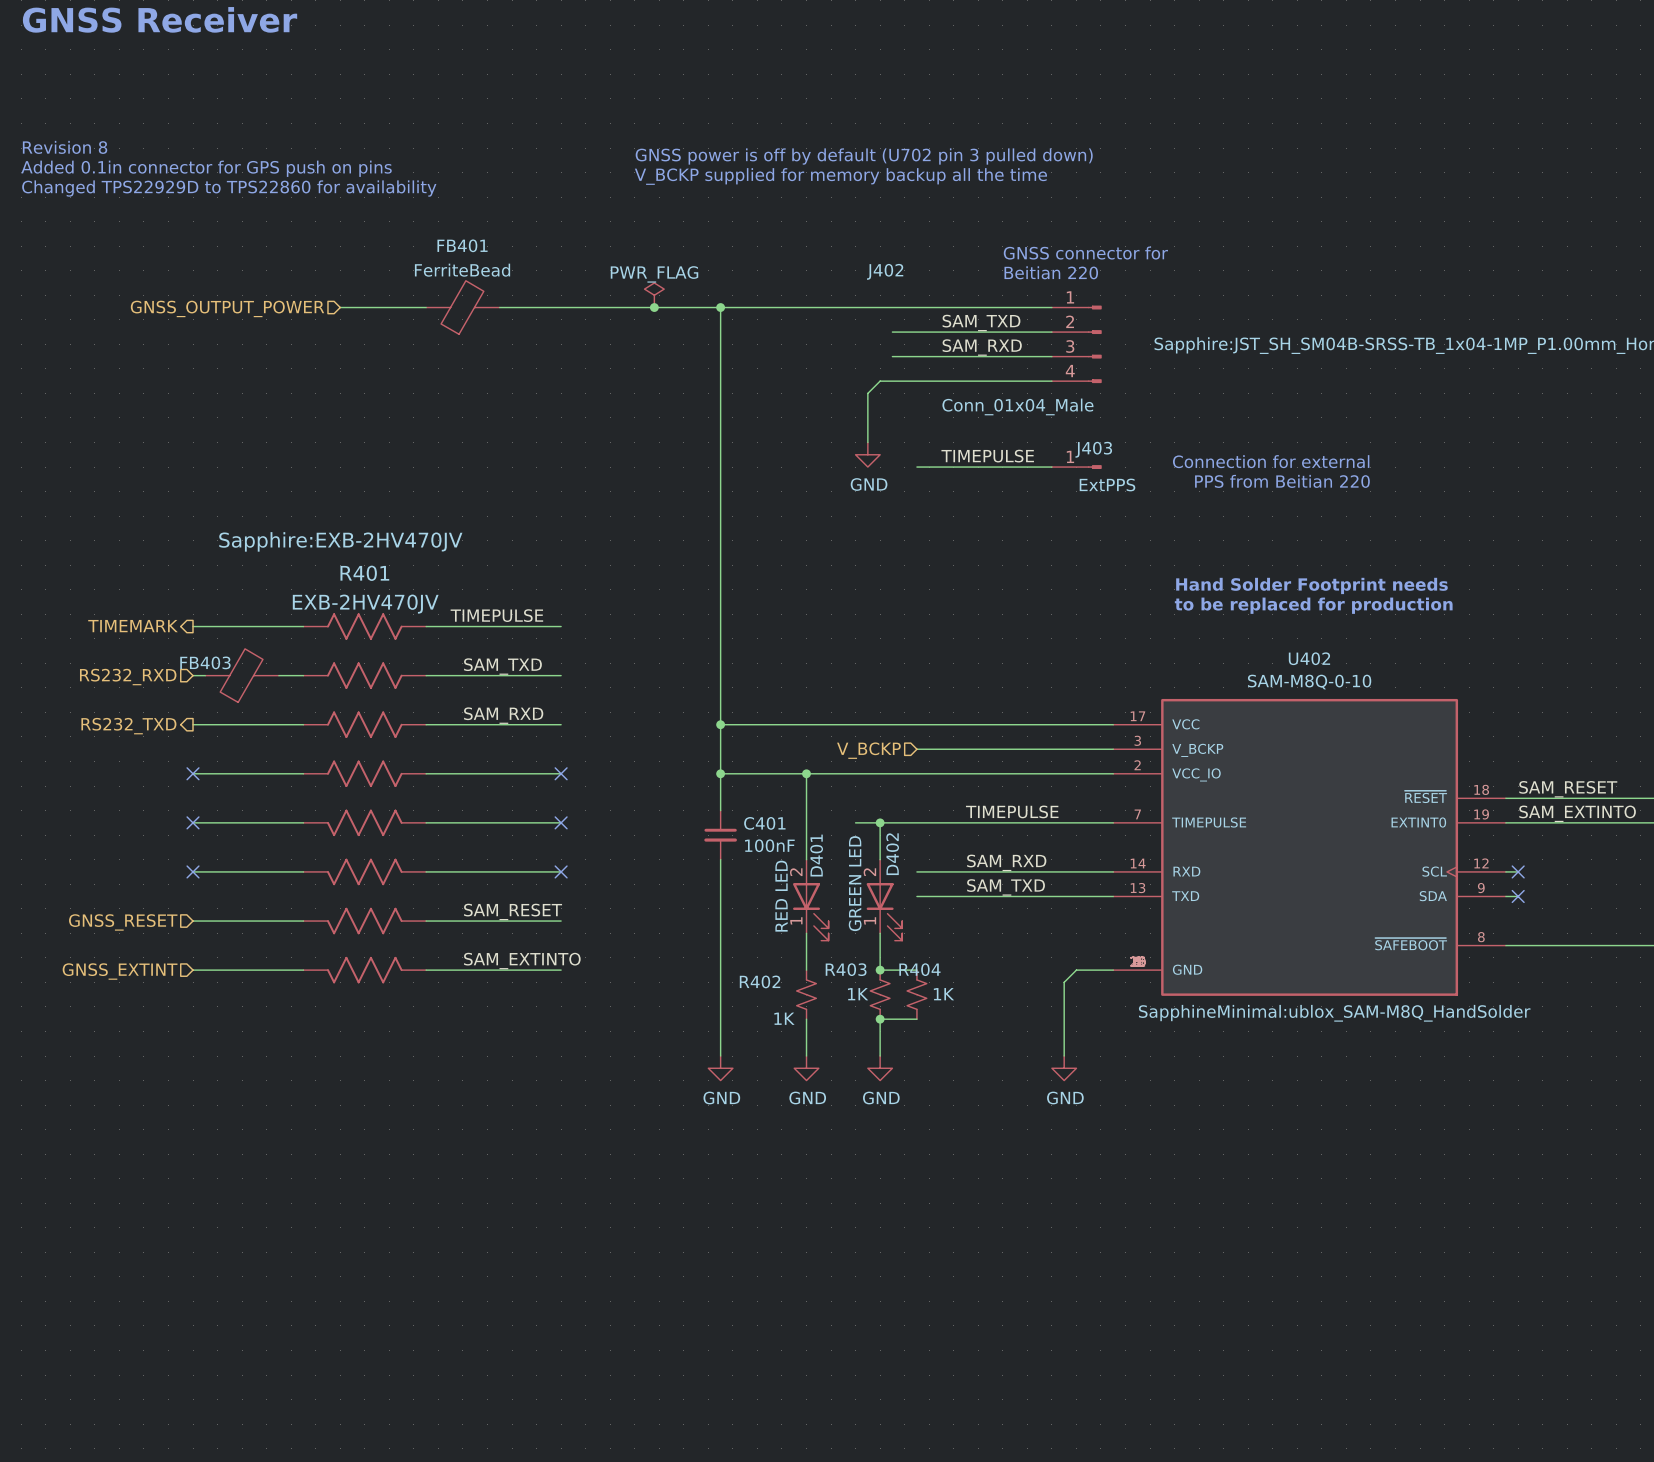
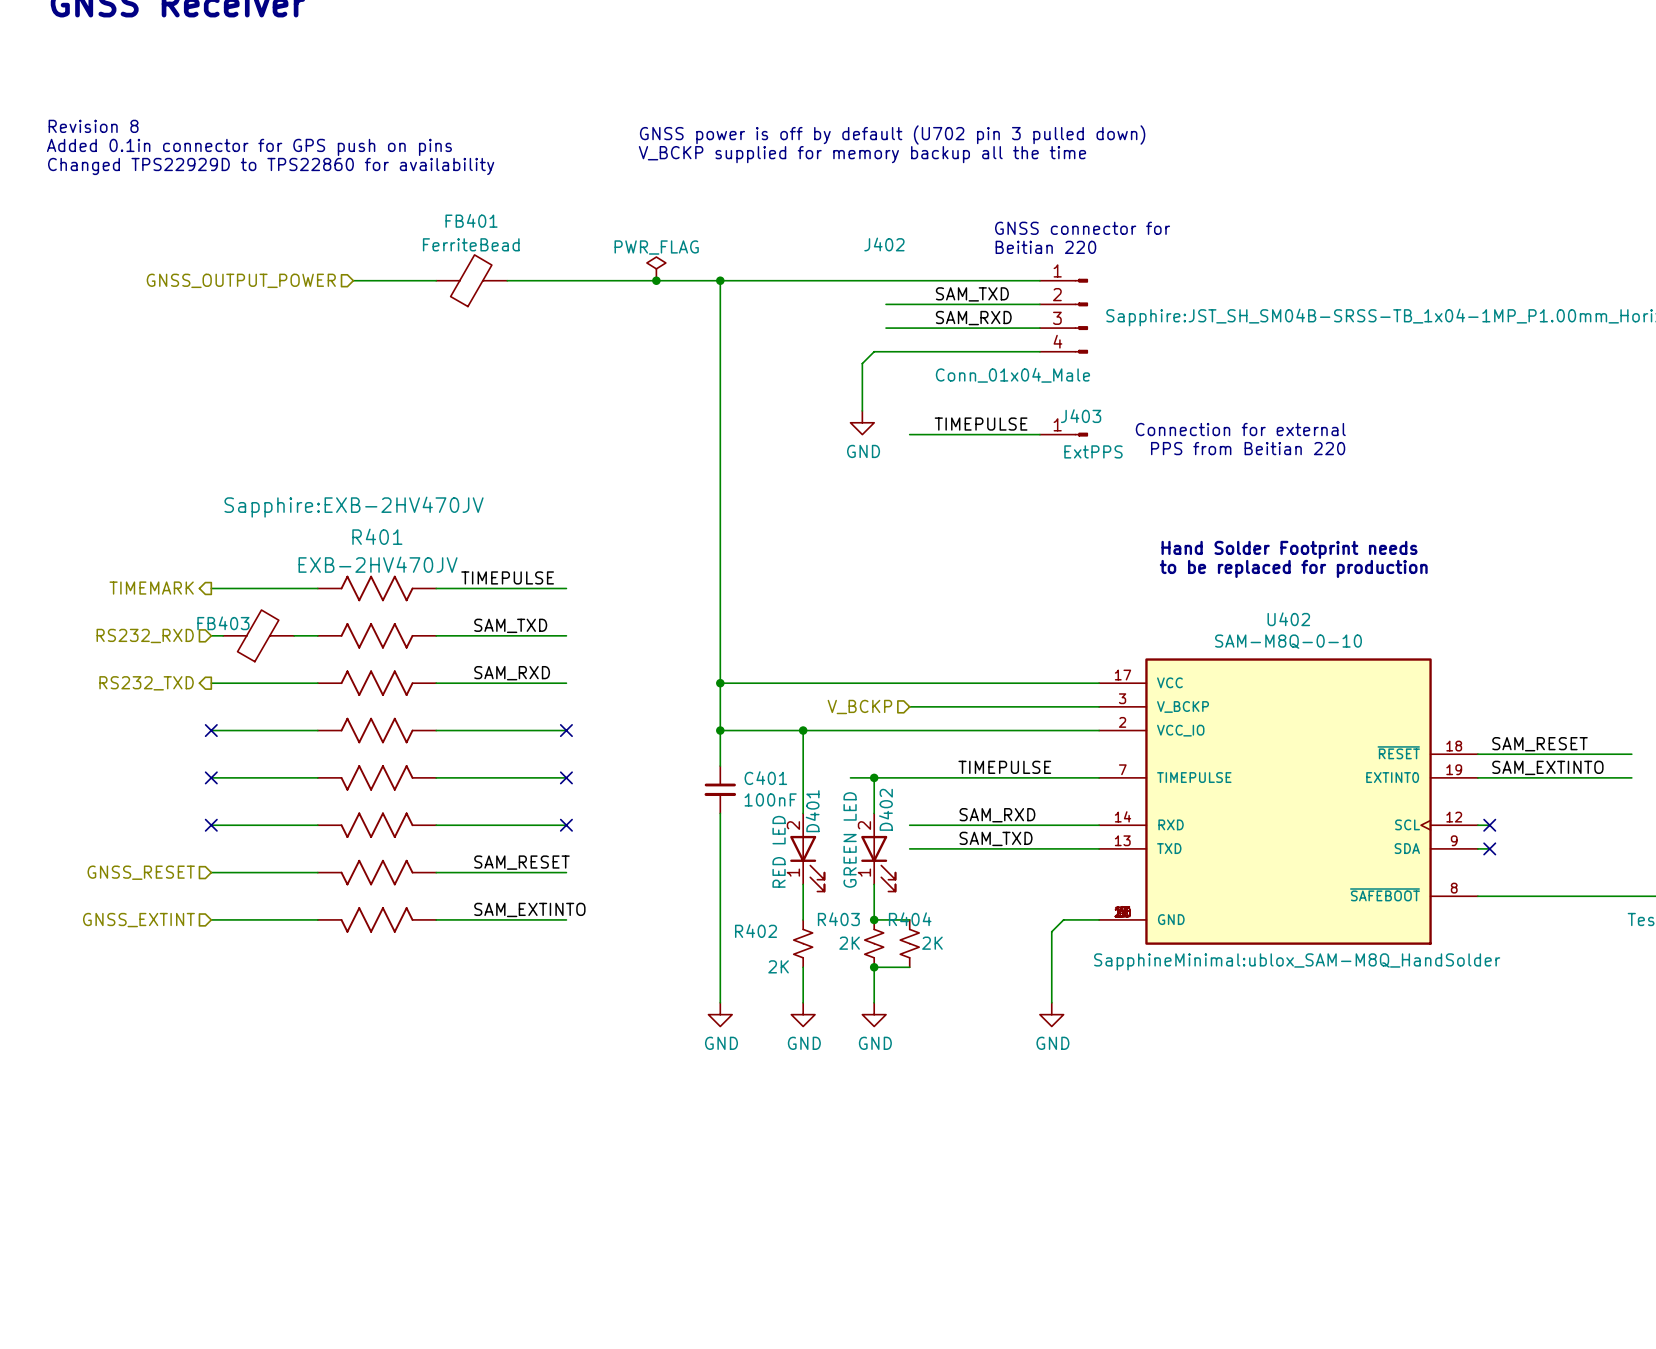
R403 value: 1K (858, 994) -> 2K (849, 943)
R404 value: 1K (943, 994) -> 2K (932, 943)
R402 value: 1K (784, 1018) -> 2K (778, 966)

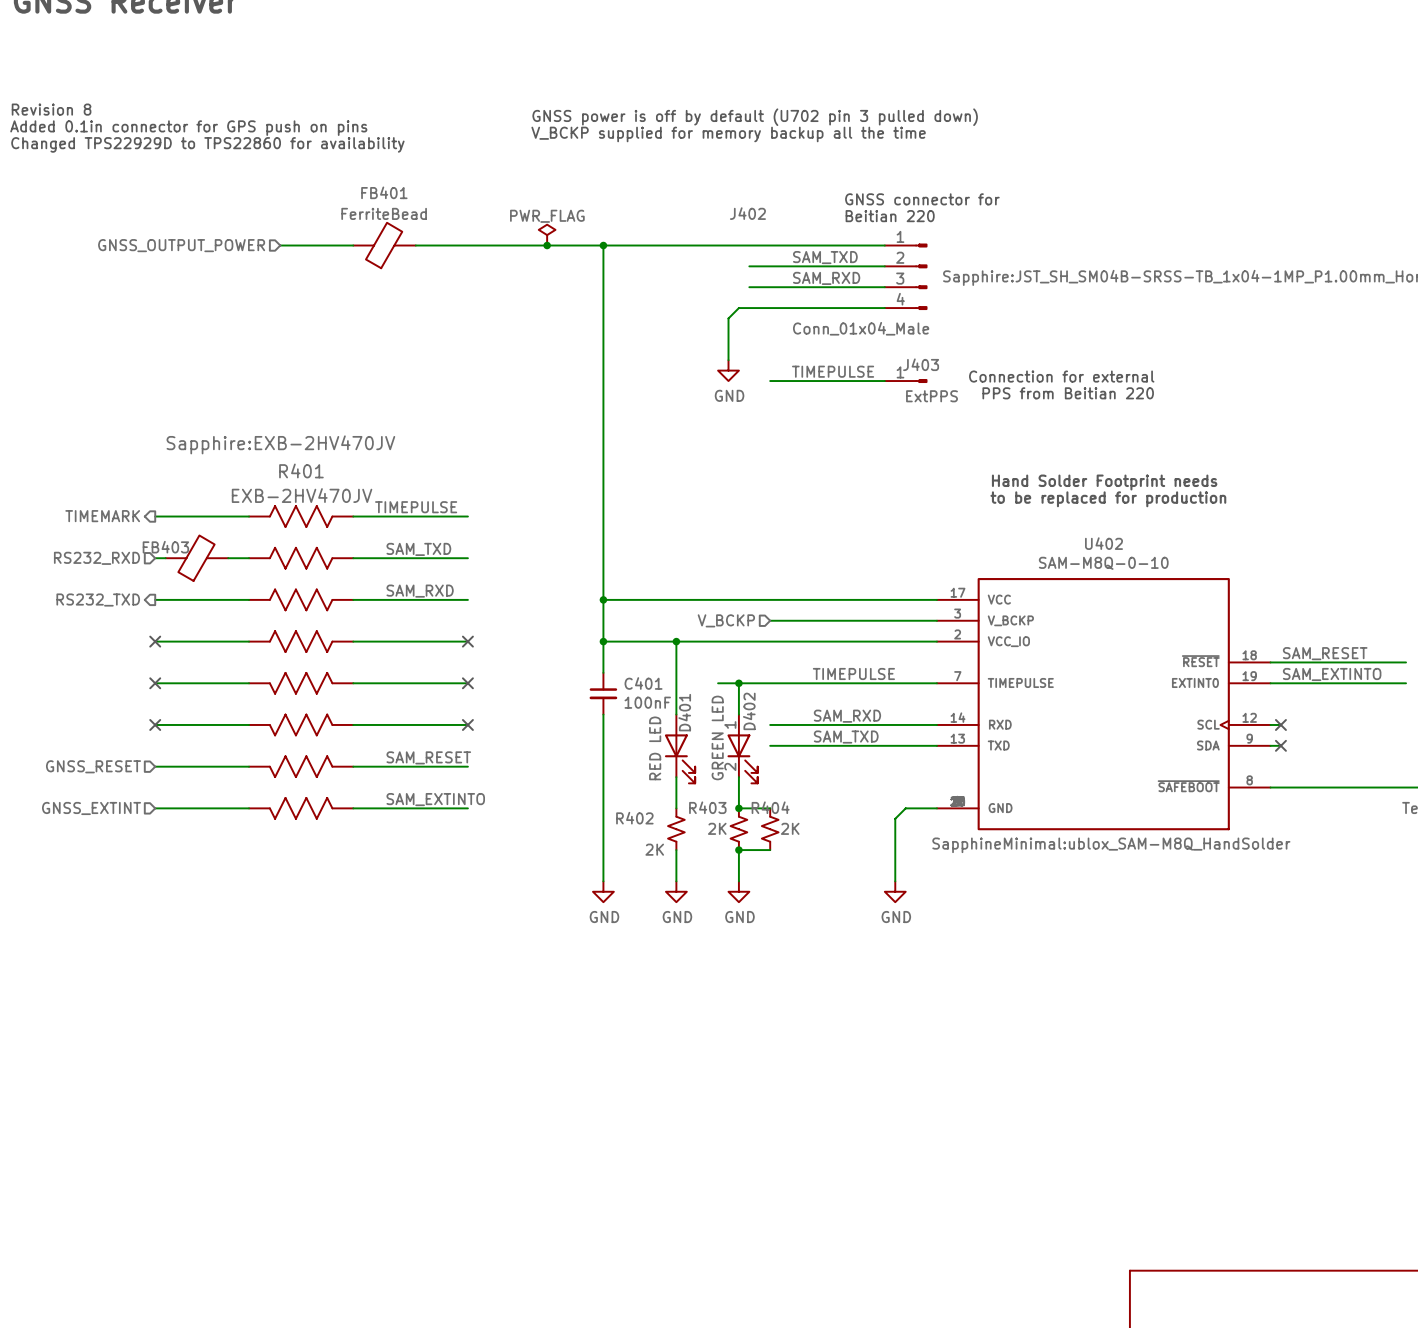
D401 pin number: 2 (793, 825) -> none
D402 pin number: 2 (864, 825) -> 1 (730, 724)
D401 pin number: 1 (793, 872) -> none
D402 pin number: 1 (864, 872) -> 2 (730, 766)

